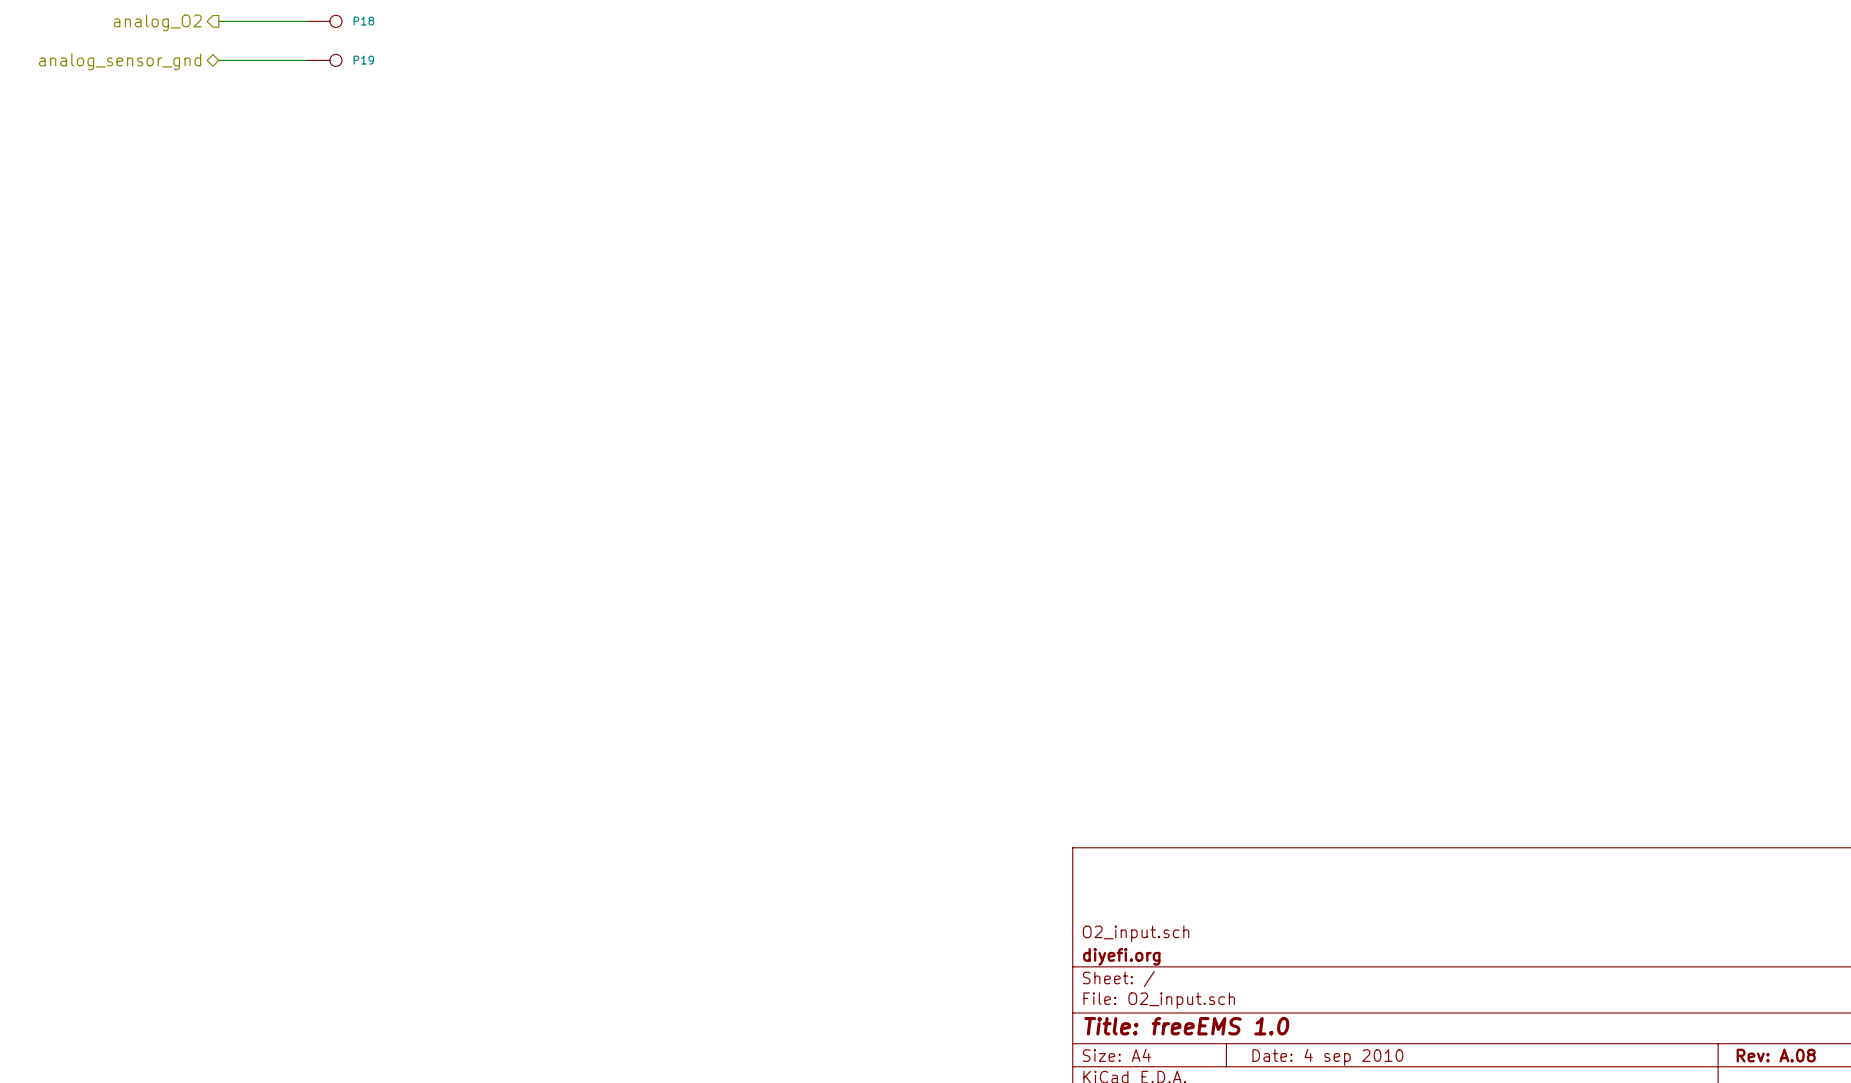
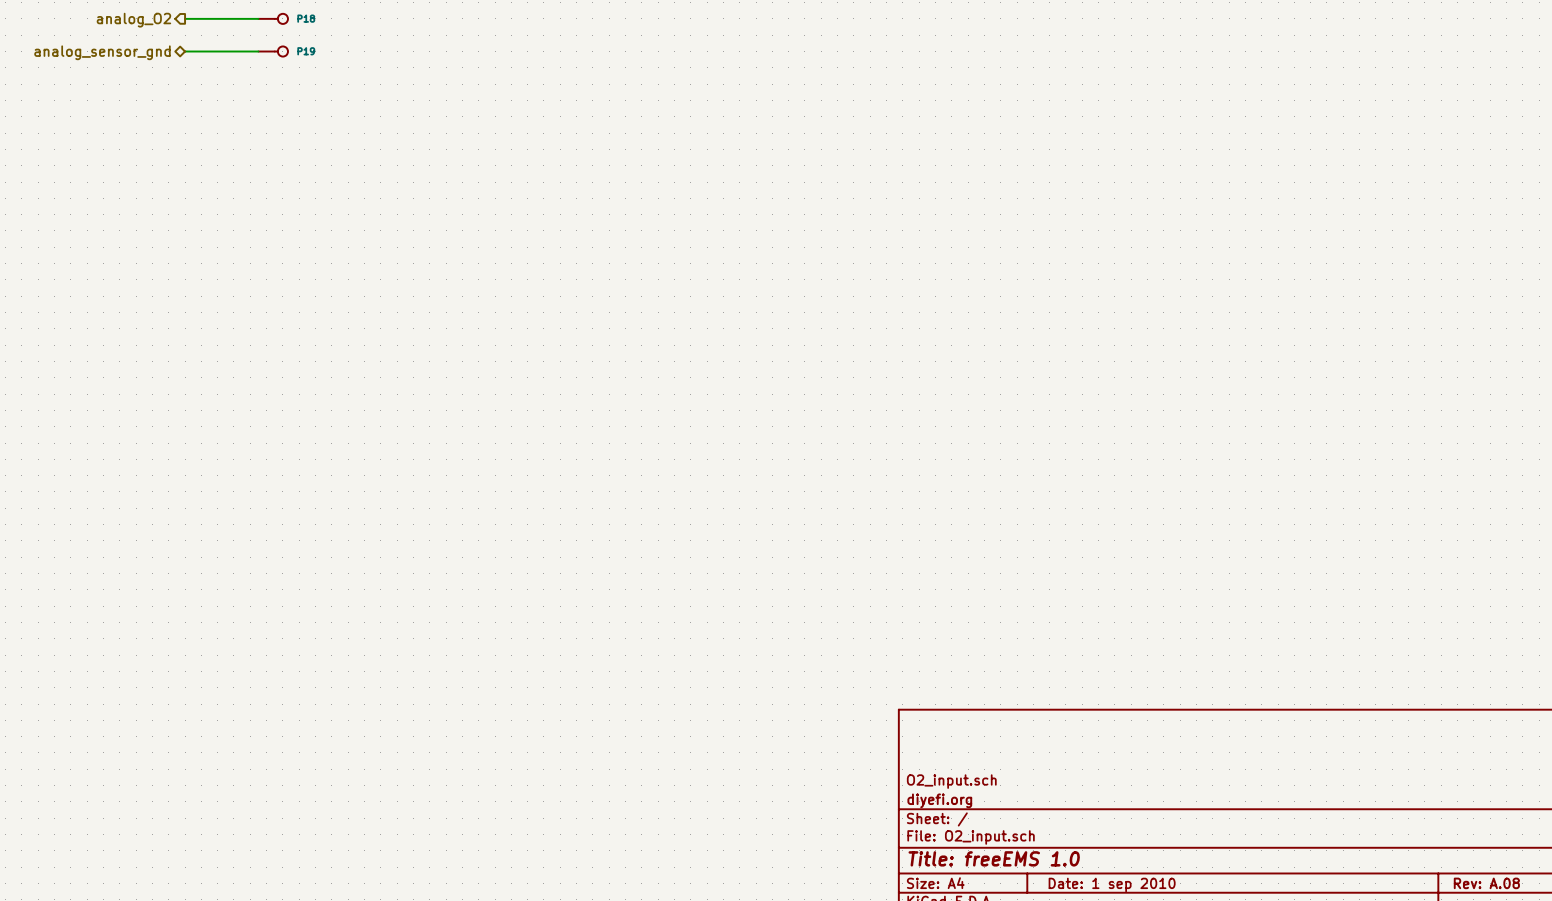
title block: Date: 4 sep 2010 (1327, 1057) -> Date: 1 sep 2010 (1112, 884)

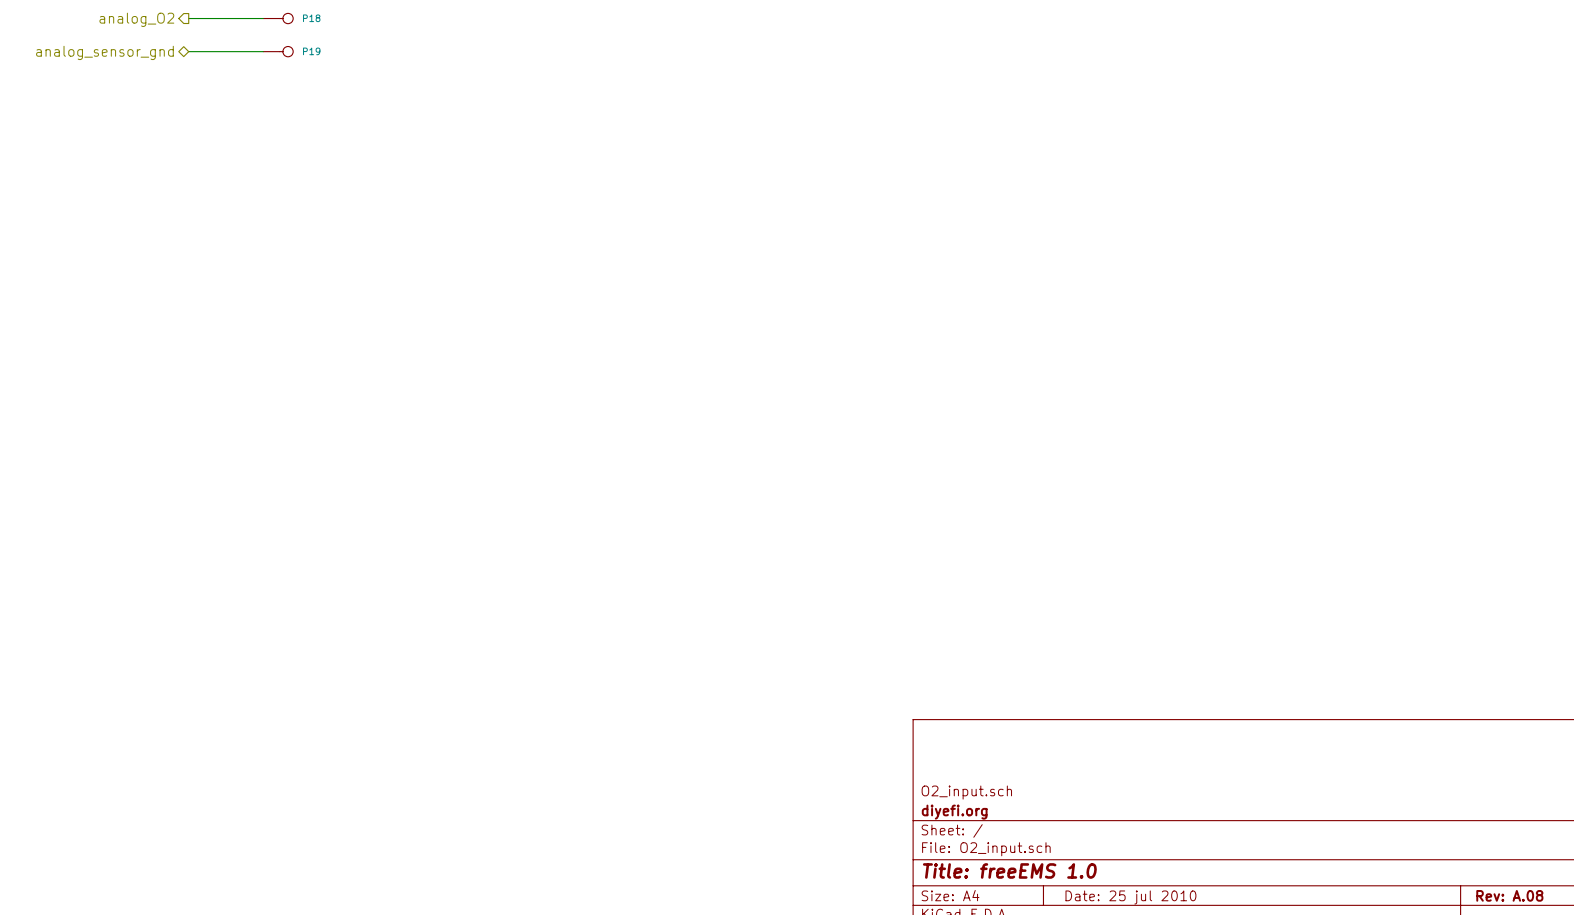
title block: Date: 1 sep 2010 (1112, 884) -> Date: 25 jul 2010 (1130, 897)

